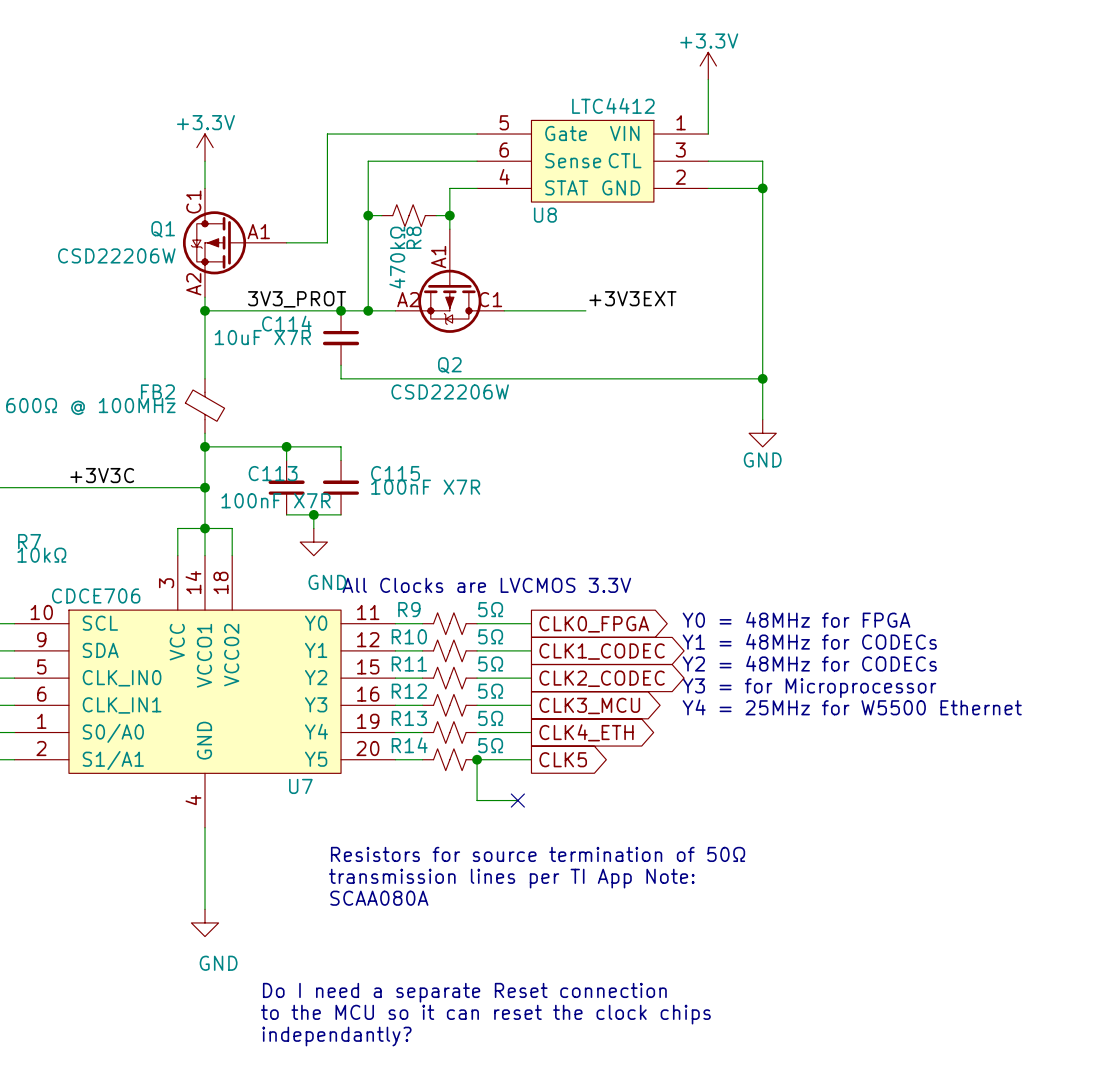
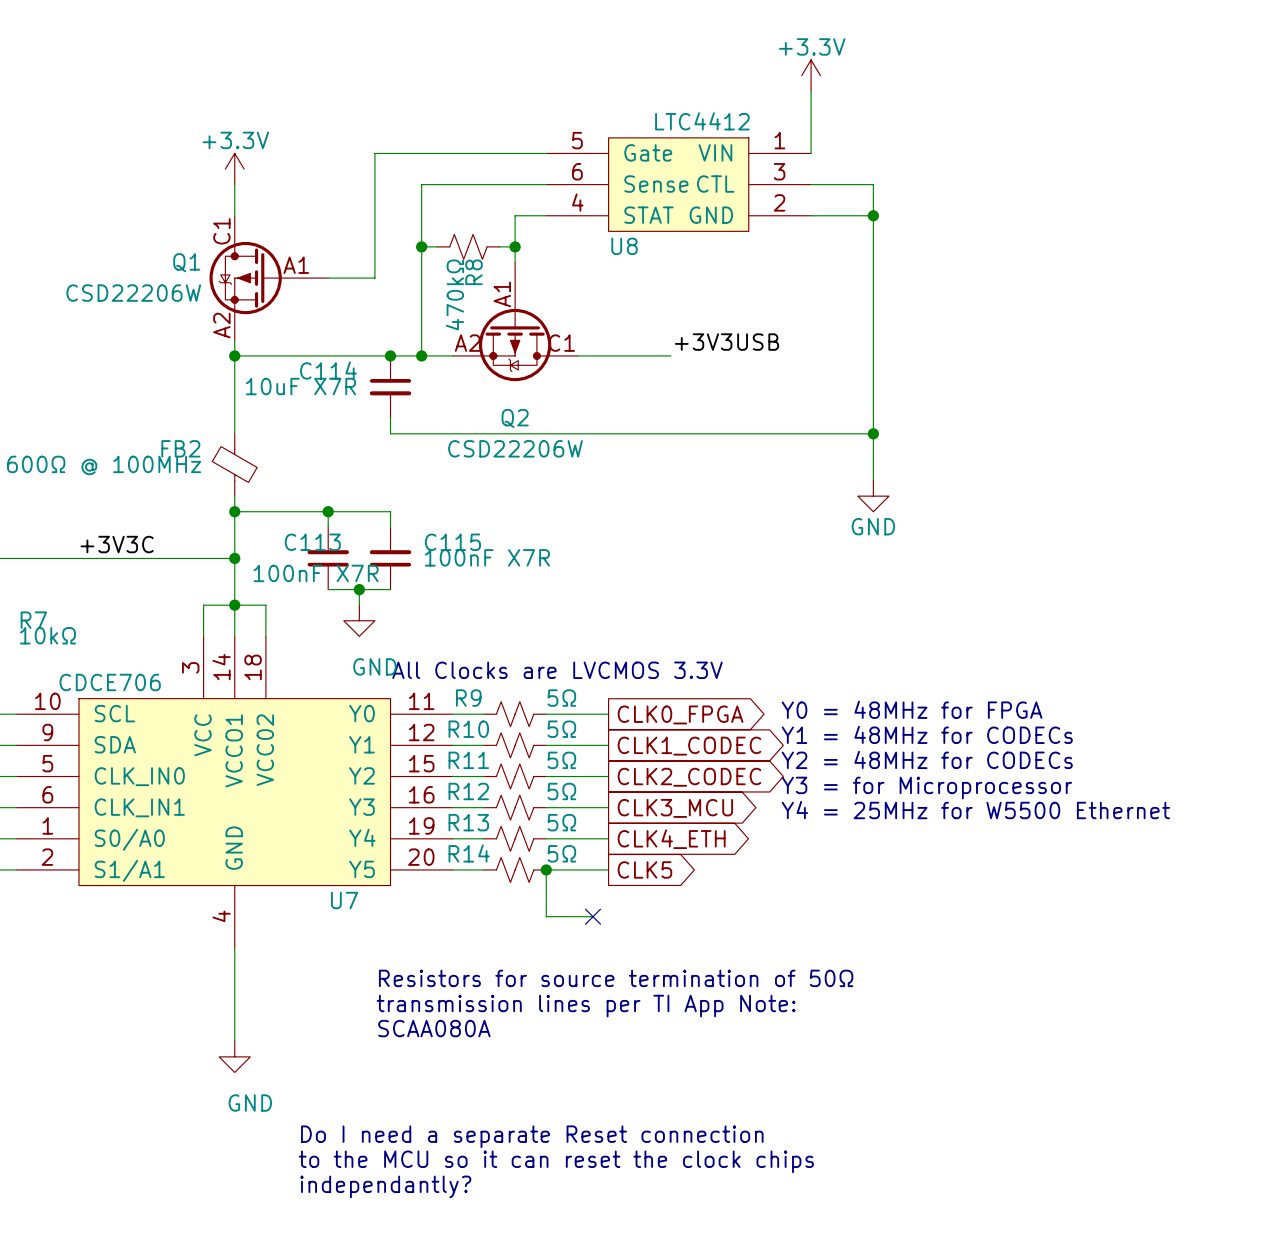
label: +3V3EXT (632, 298) -> +3V3USB (727, 342)
label: 3V3_PROT (297, 299) -> none

